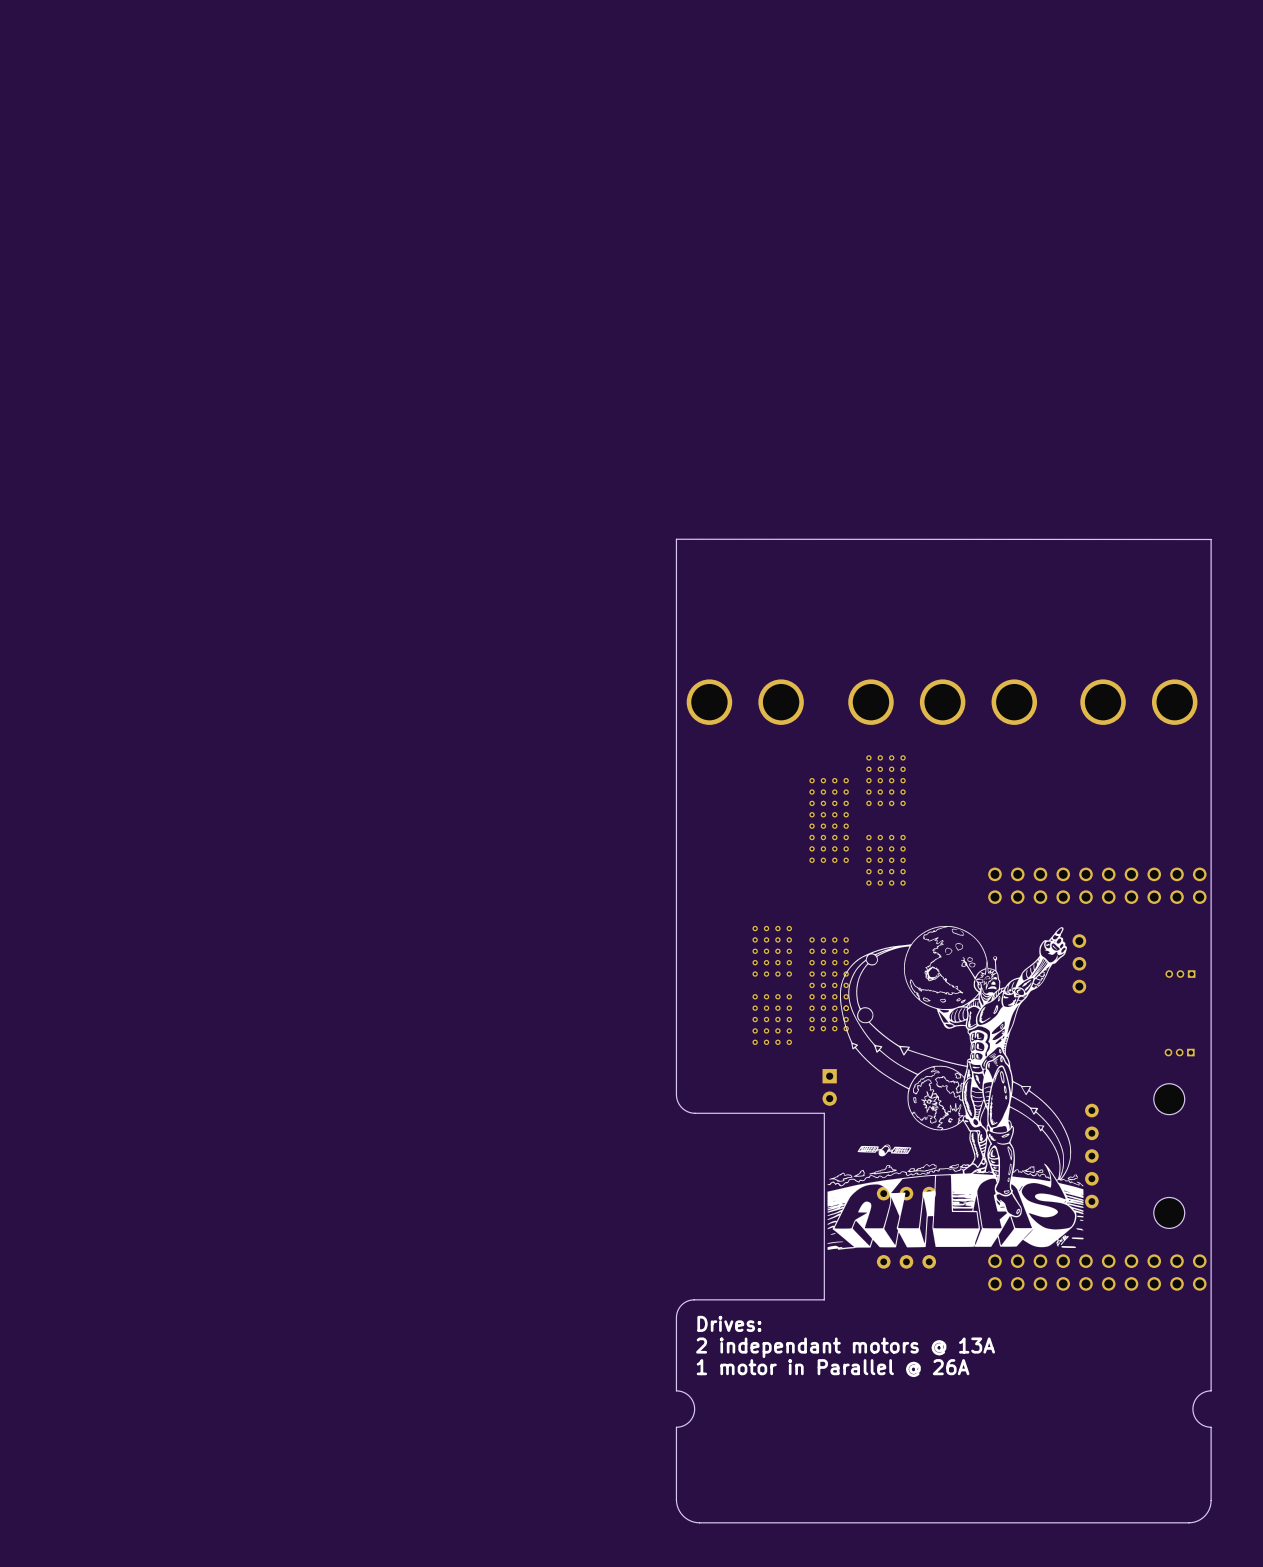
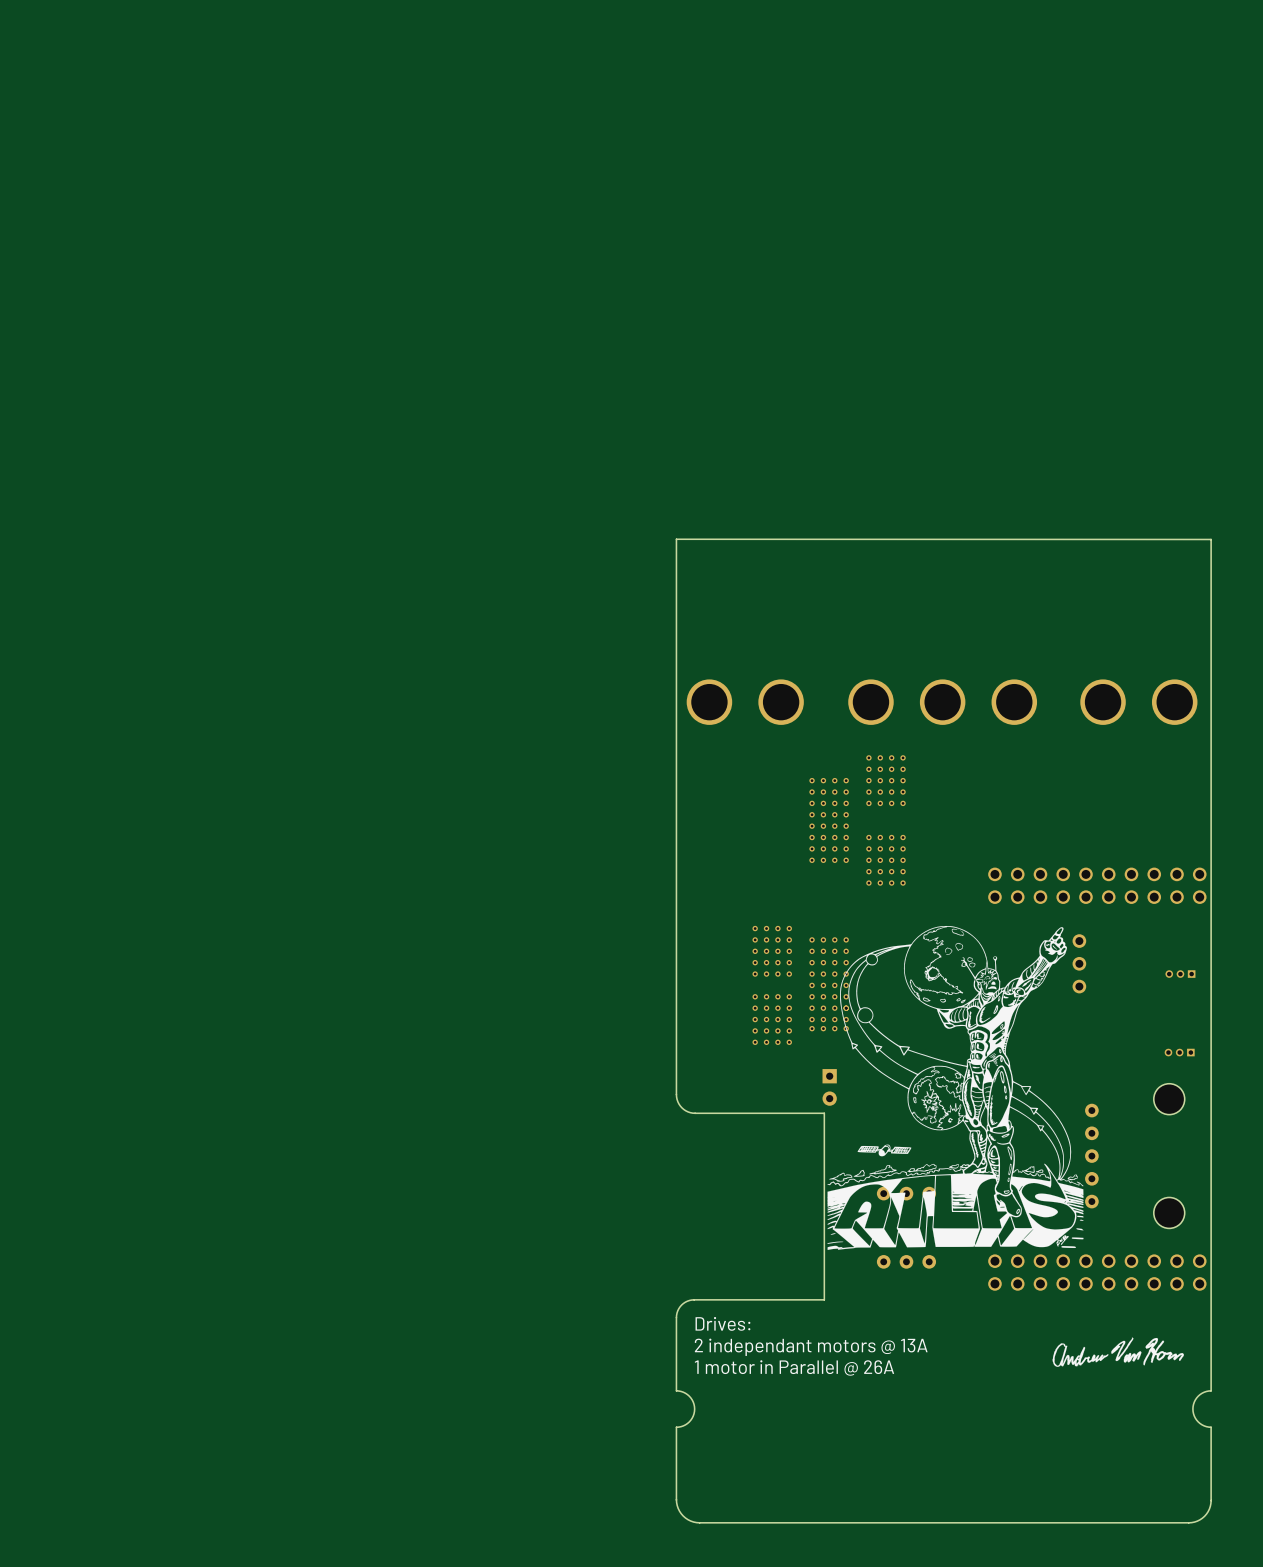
drawing: none -> [1052, 1337, 1184, 1367]

